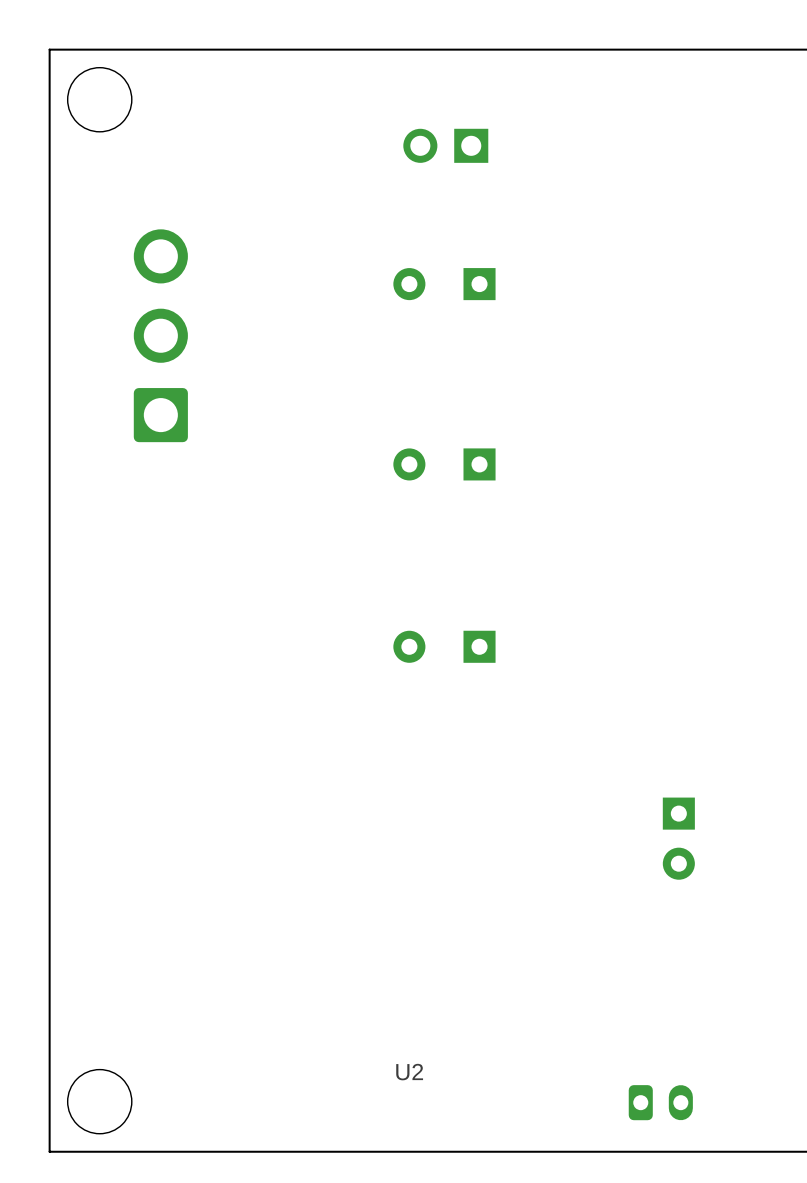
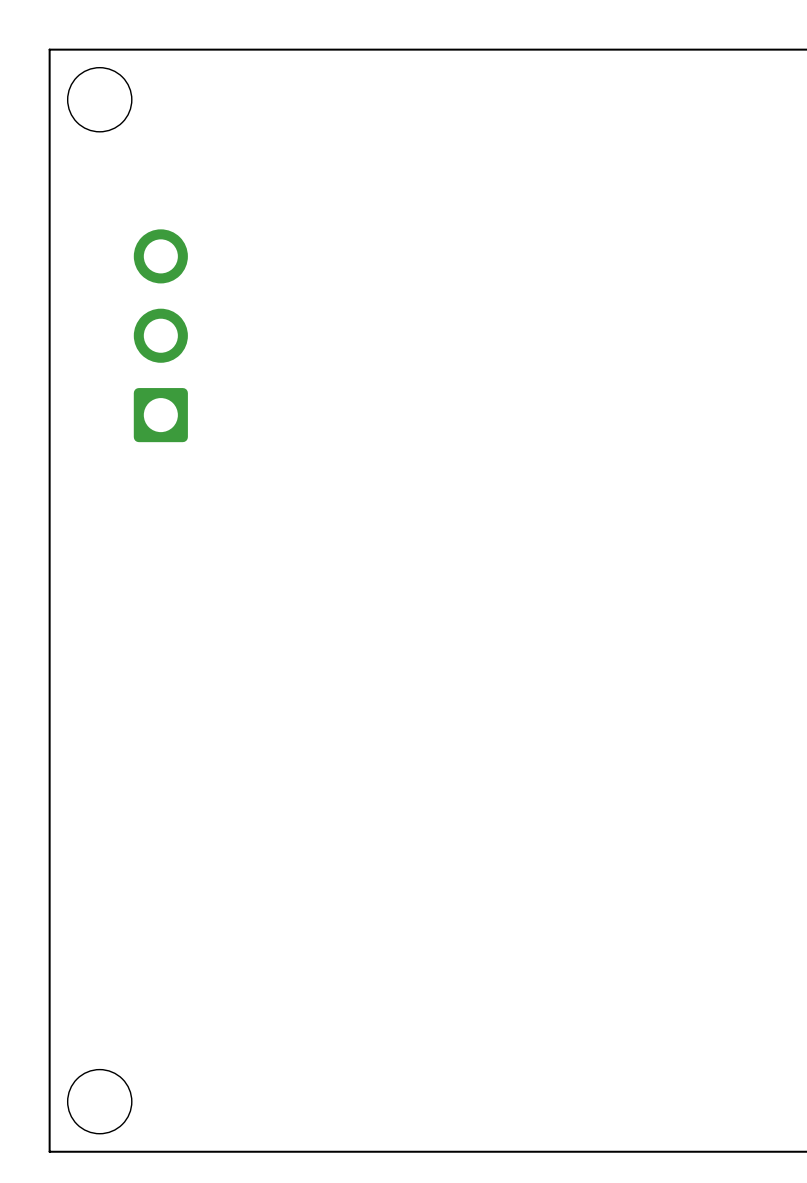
part: (445, 145) -> none
part: (444, 284) -> none
part: (444, 464) -> none
part: (444, 646) -> none
part: (678, 838) -> none
U2: (409, 1072) -> none
part: (660, 1102) -> none

